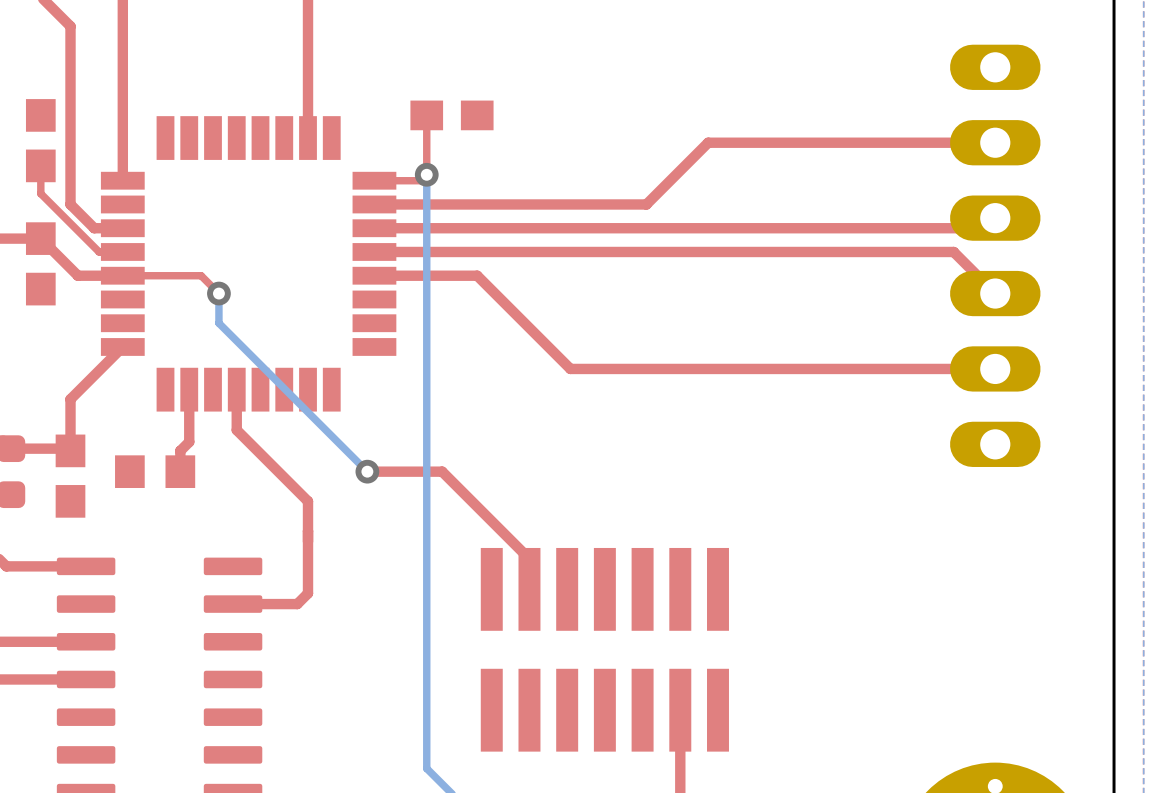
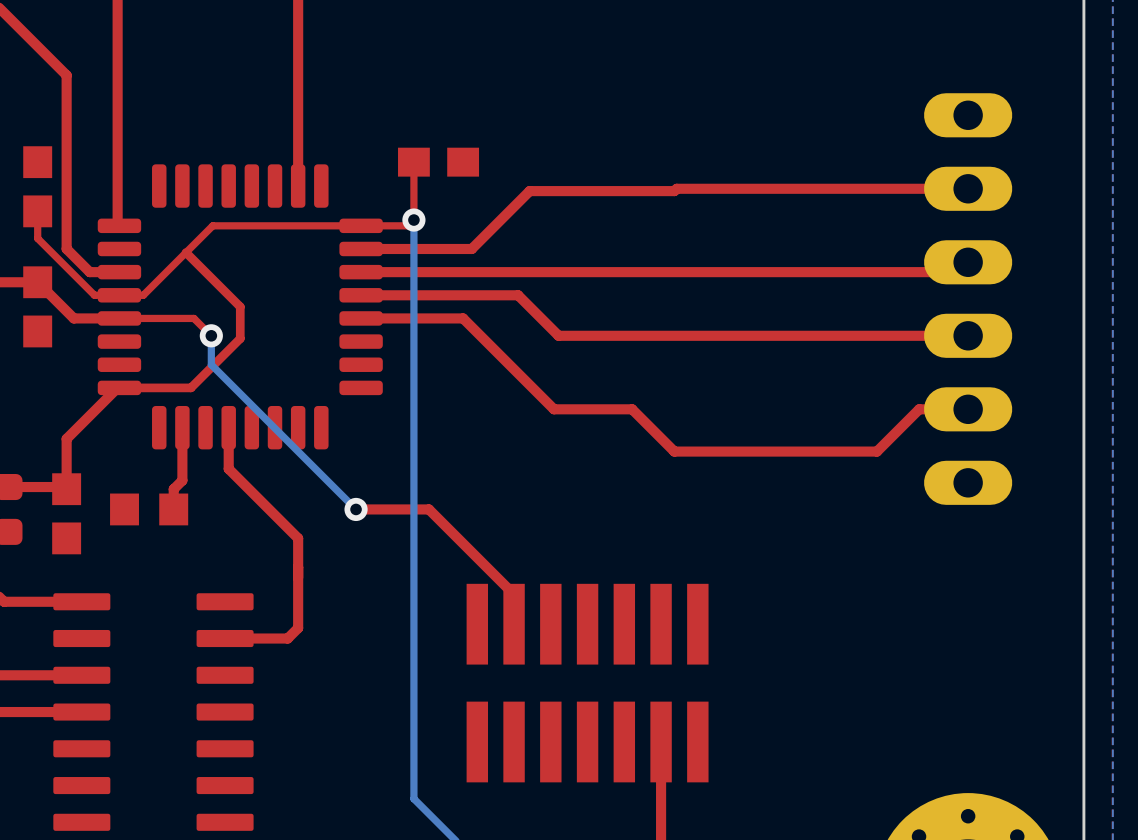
part footprint: [100, 116, 397, 412] -> [97, 164, 383, 450]
top track: (708, 142) (646, 204) (486, 204) -> (688, 188) (676, 188) (674, 191) (529, 191) (471, 248)
top track: none -> (362, 225) (212, 225) (143, 295) (117, 295)
top track: none -> (186, 252) (240, 306) (240, 338) (190, 387) (117, 387)
top track: (533, 251) (953, 251) (995, 293) -> (518, 295) (558, 335) (968, 335)
top track: (945, 368) (650, 368) -> (919, 409) (876, 451) (674, 451) (632, 409)

